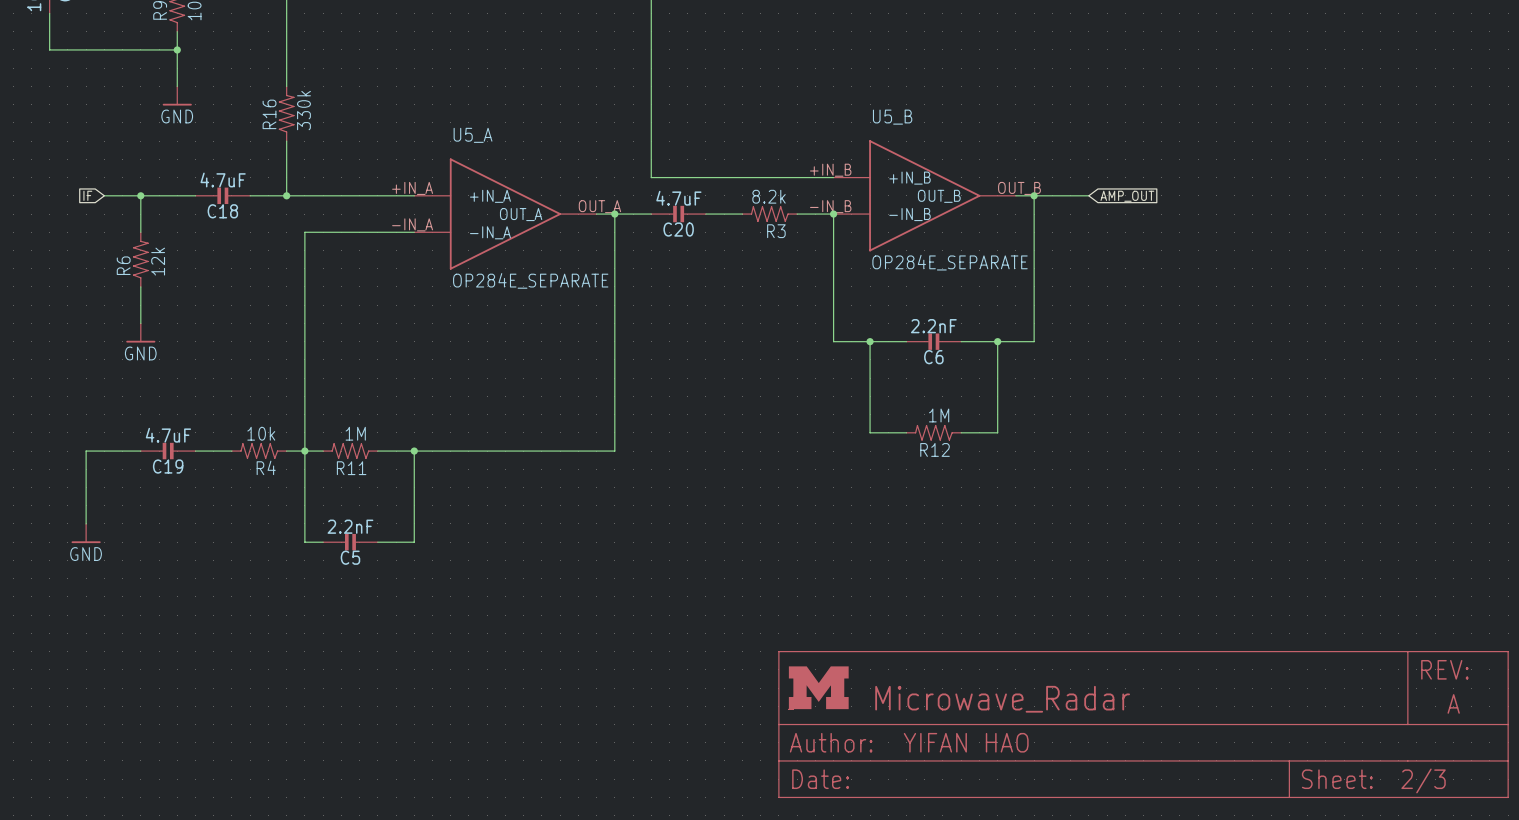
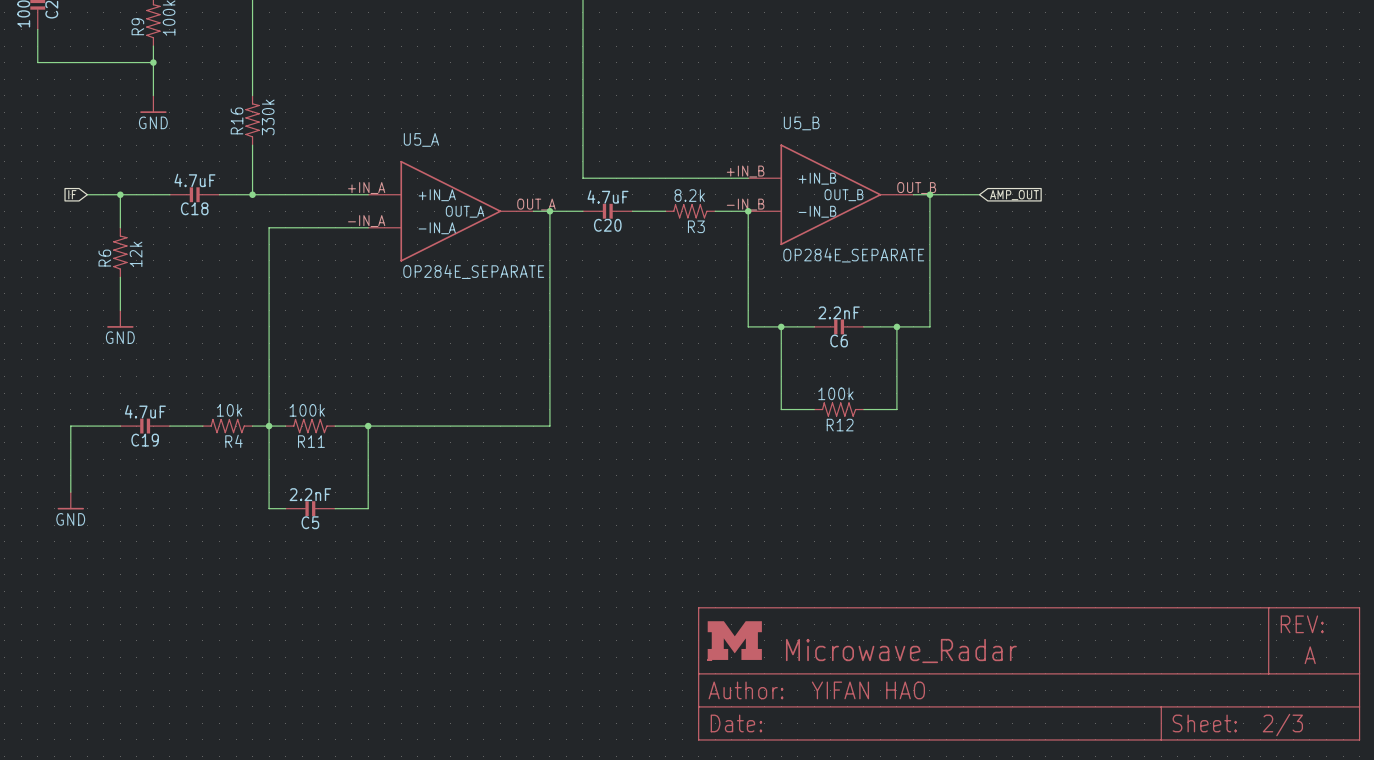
R12 value: 1M (939, 415) -> 100k (835, 393)
R11 value: 1M (355, 433) -> 100k (307, 410)

